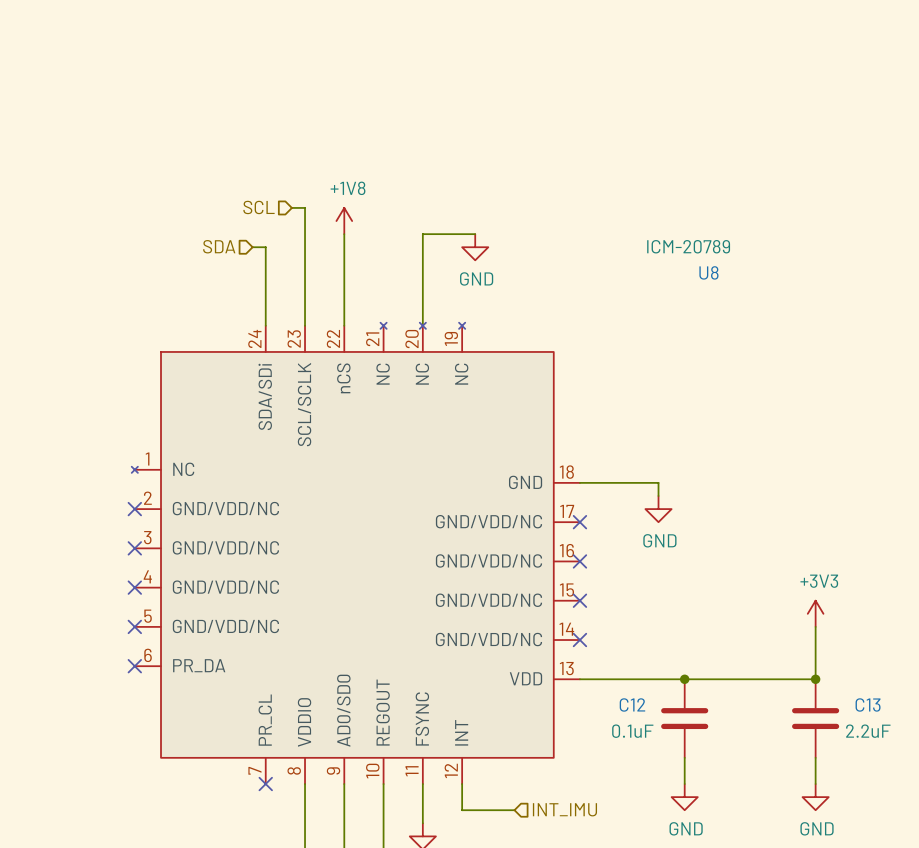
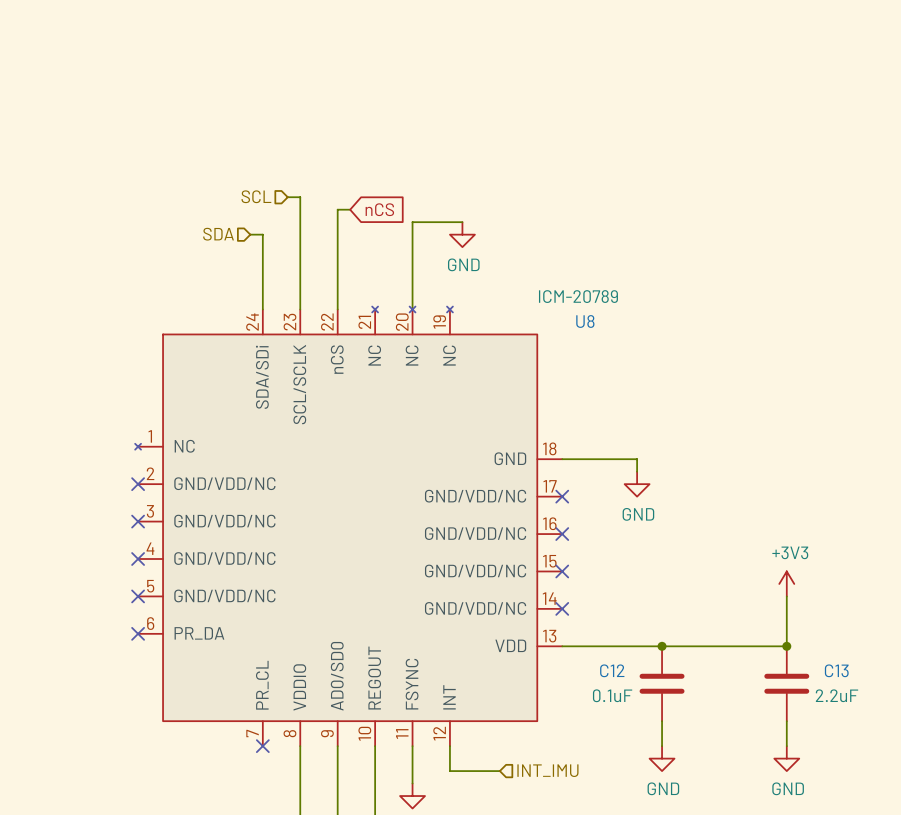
power symbol: +1V8 (344, 221) -> none
global label: none -> nCS (379, 209)
U8 value position: ICM-20789 (688, 246) -> ICM-20789 (578, 296)
U8 name position: U8 (708, 272) -> U8 (585, 321)

